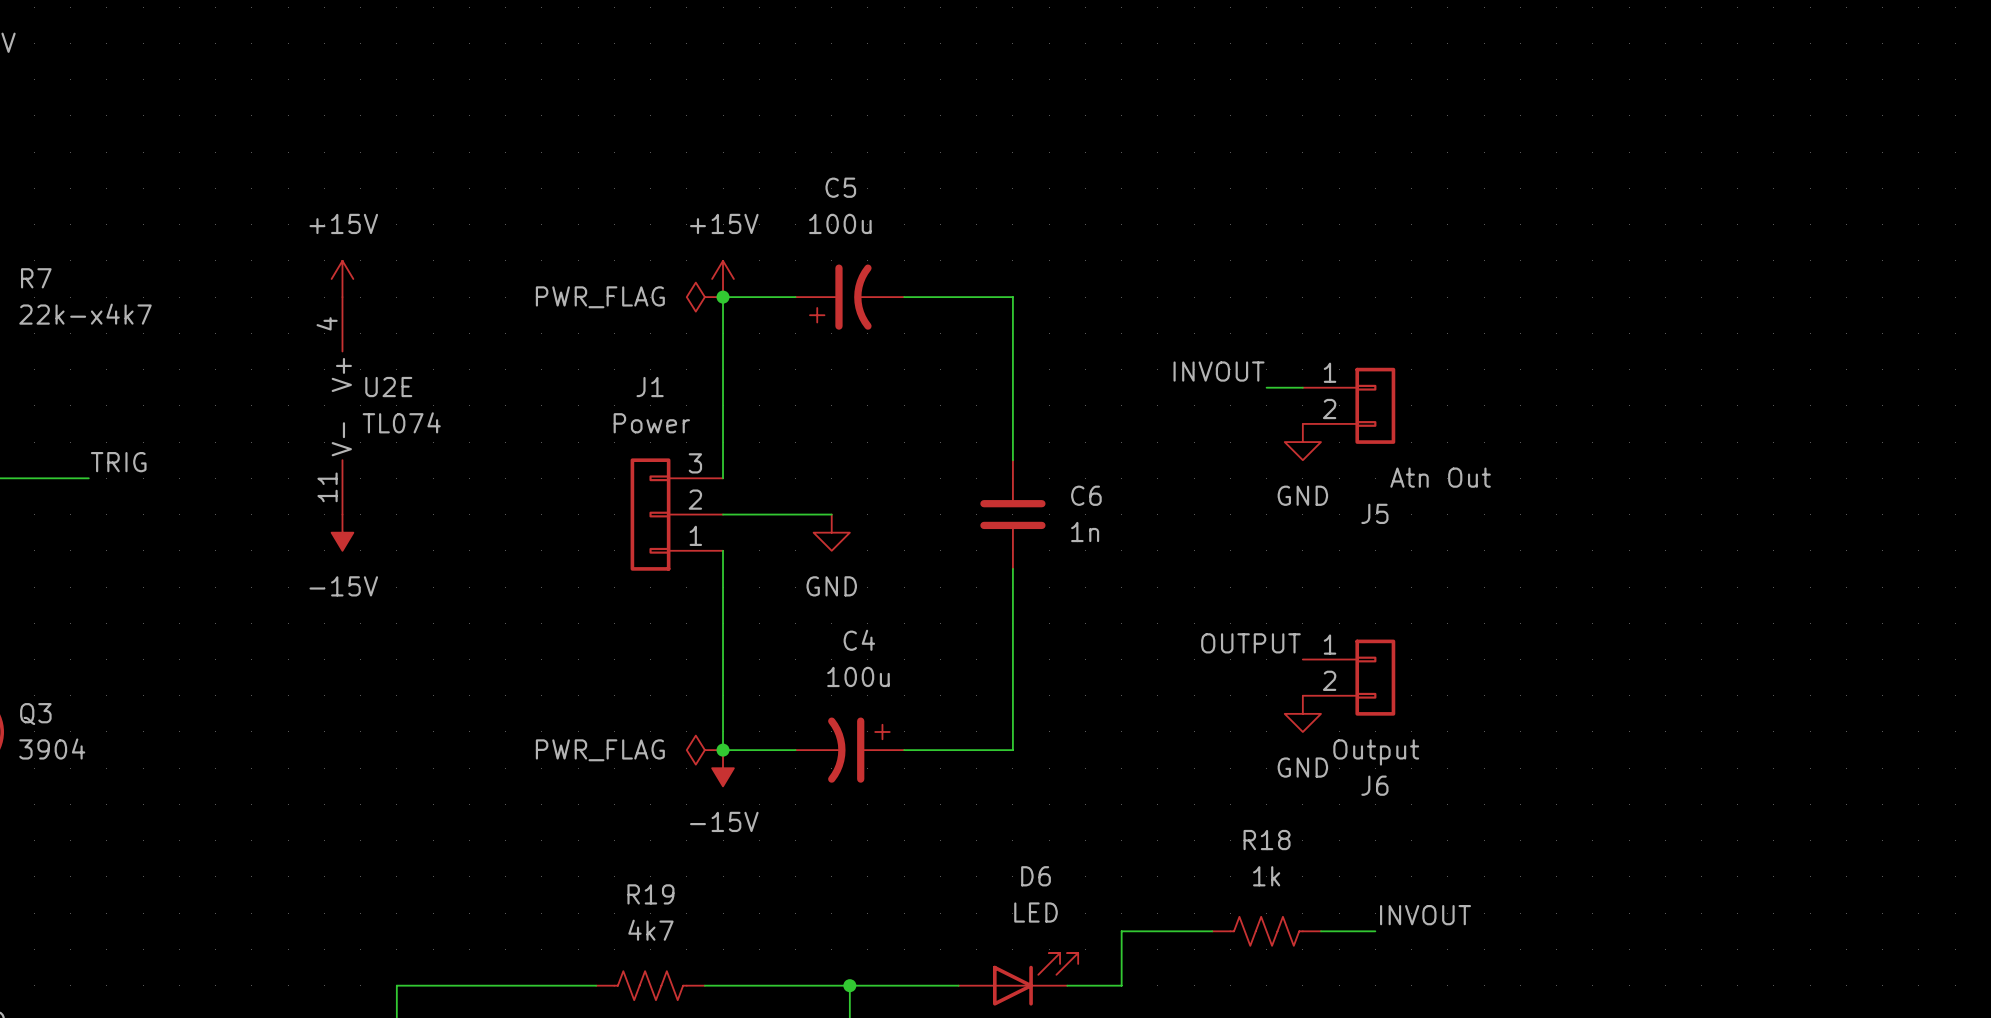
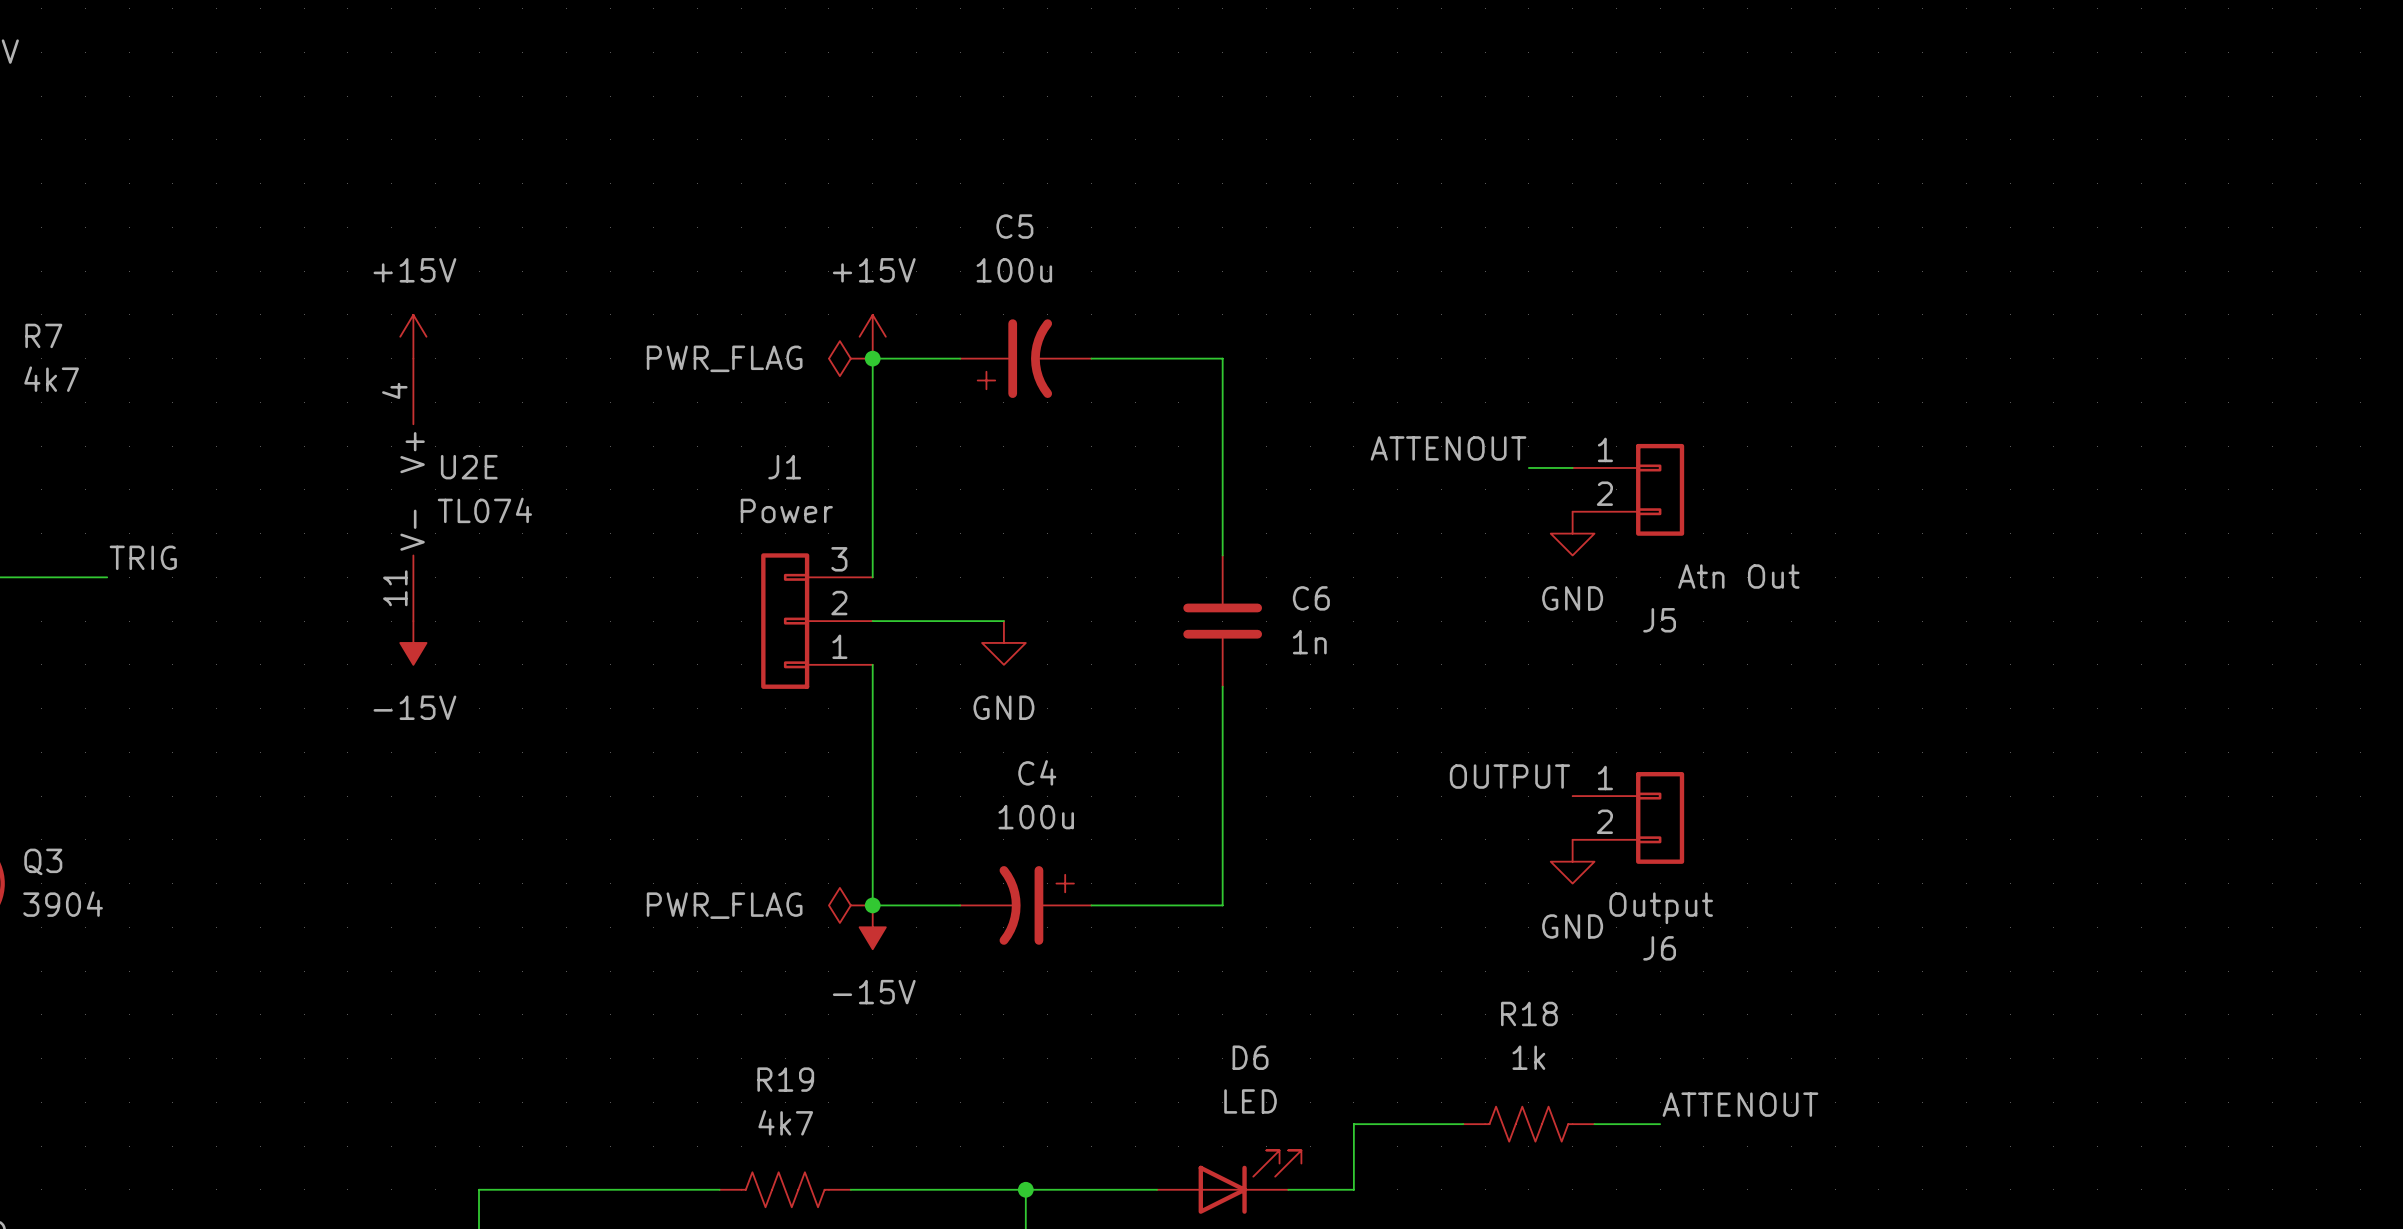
R7 value: 22k-x4k7 (85, 314) -> 4k7 (51, 379)
label: INVOUT (1219, 371) -> ATTENOUT (1448, 448)
label: INVOUT (1425, 915) -> ATTENOUT (1740, 1104)

